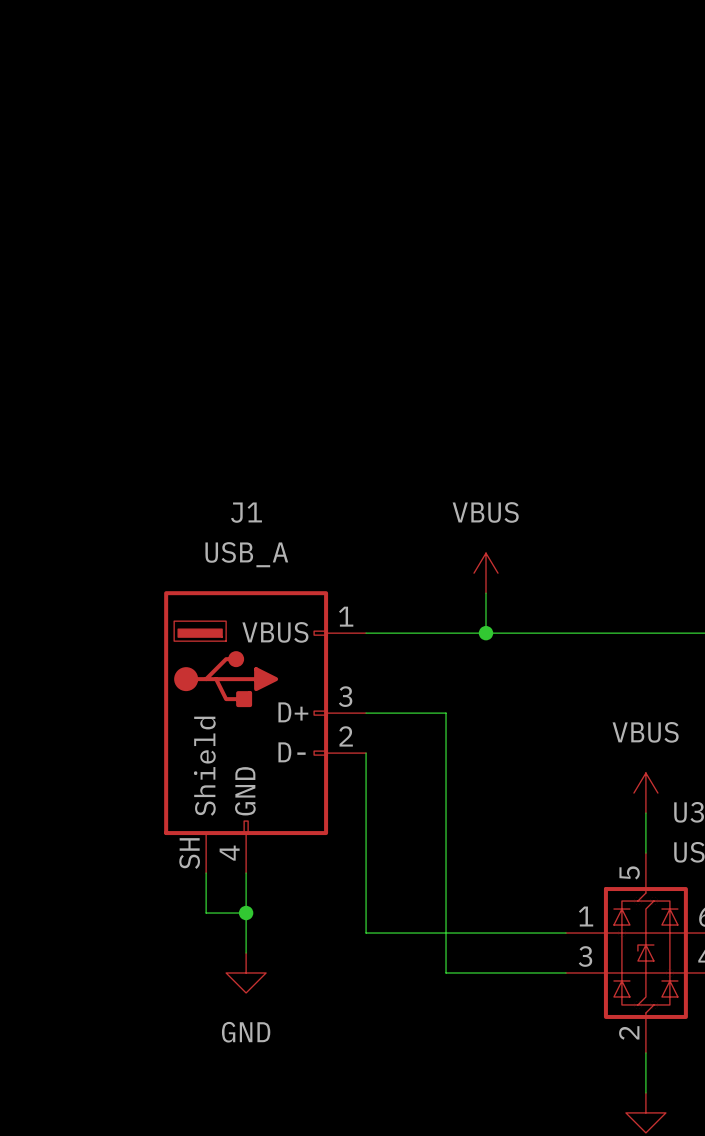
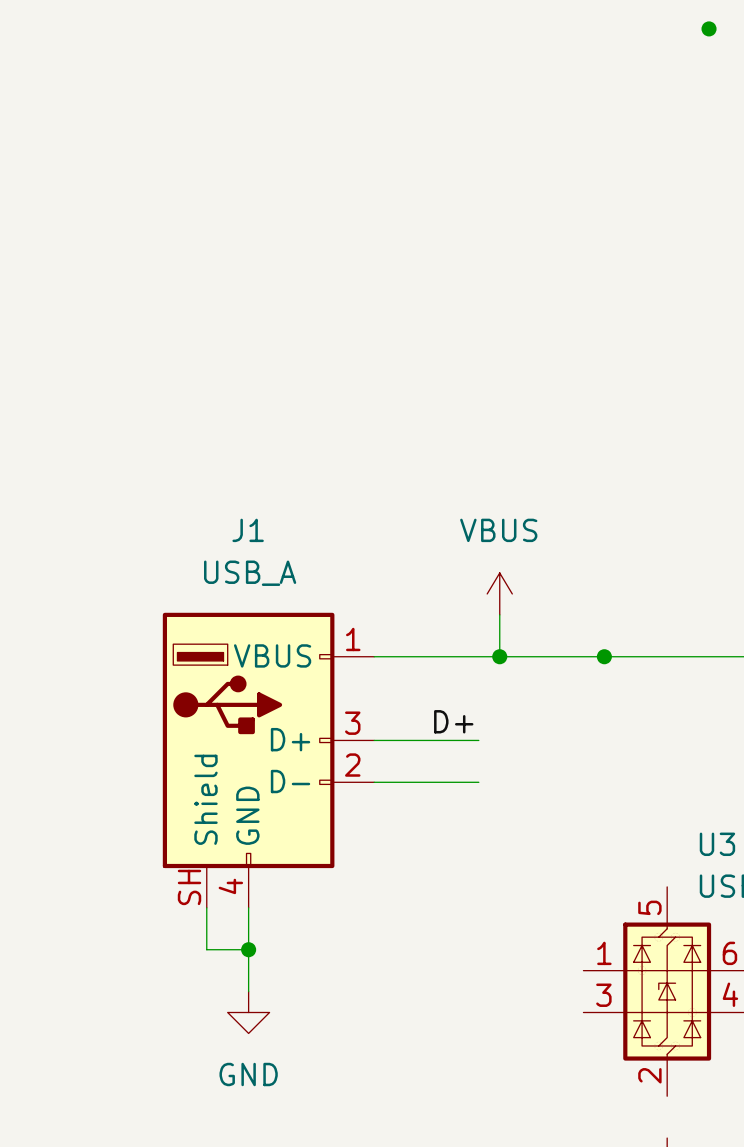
junction: none -> (709, 28)
junction: none -> (604, 656)
label: none -> D+ (453, 721)
wire: (446, 713) (446, 972) (565, 972) -> (457, 740) (478, 740)
wire: (366, 753) (366, 933) (565, 933) -> (374, 782) (478, 782)
power symbol: VBUS (645, 793) -> none
wire: (645, 813) (645, 853) -> none
wire: (645, 1052) (645, 1092) -> none

